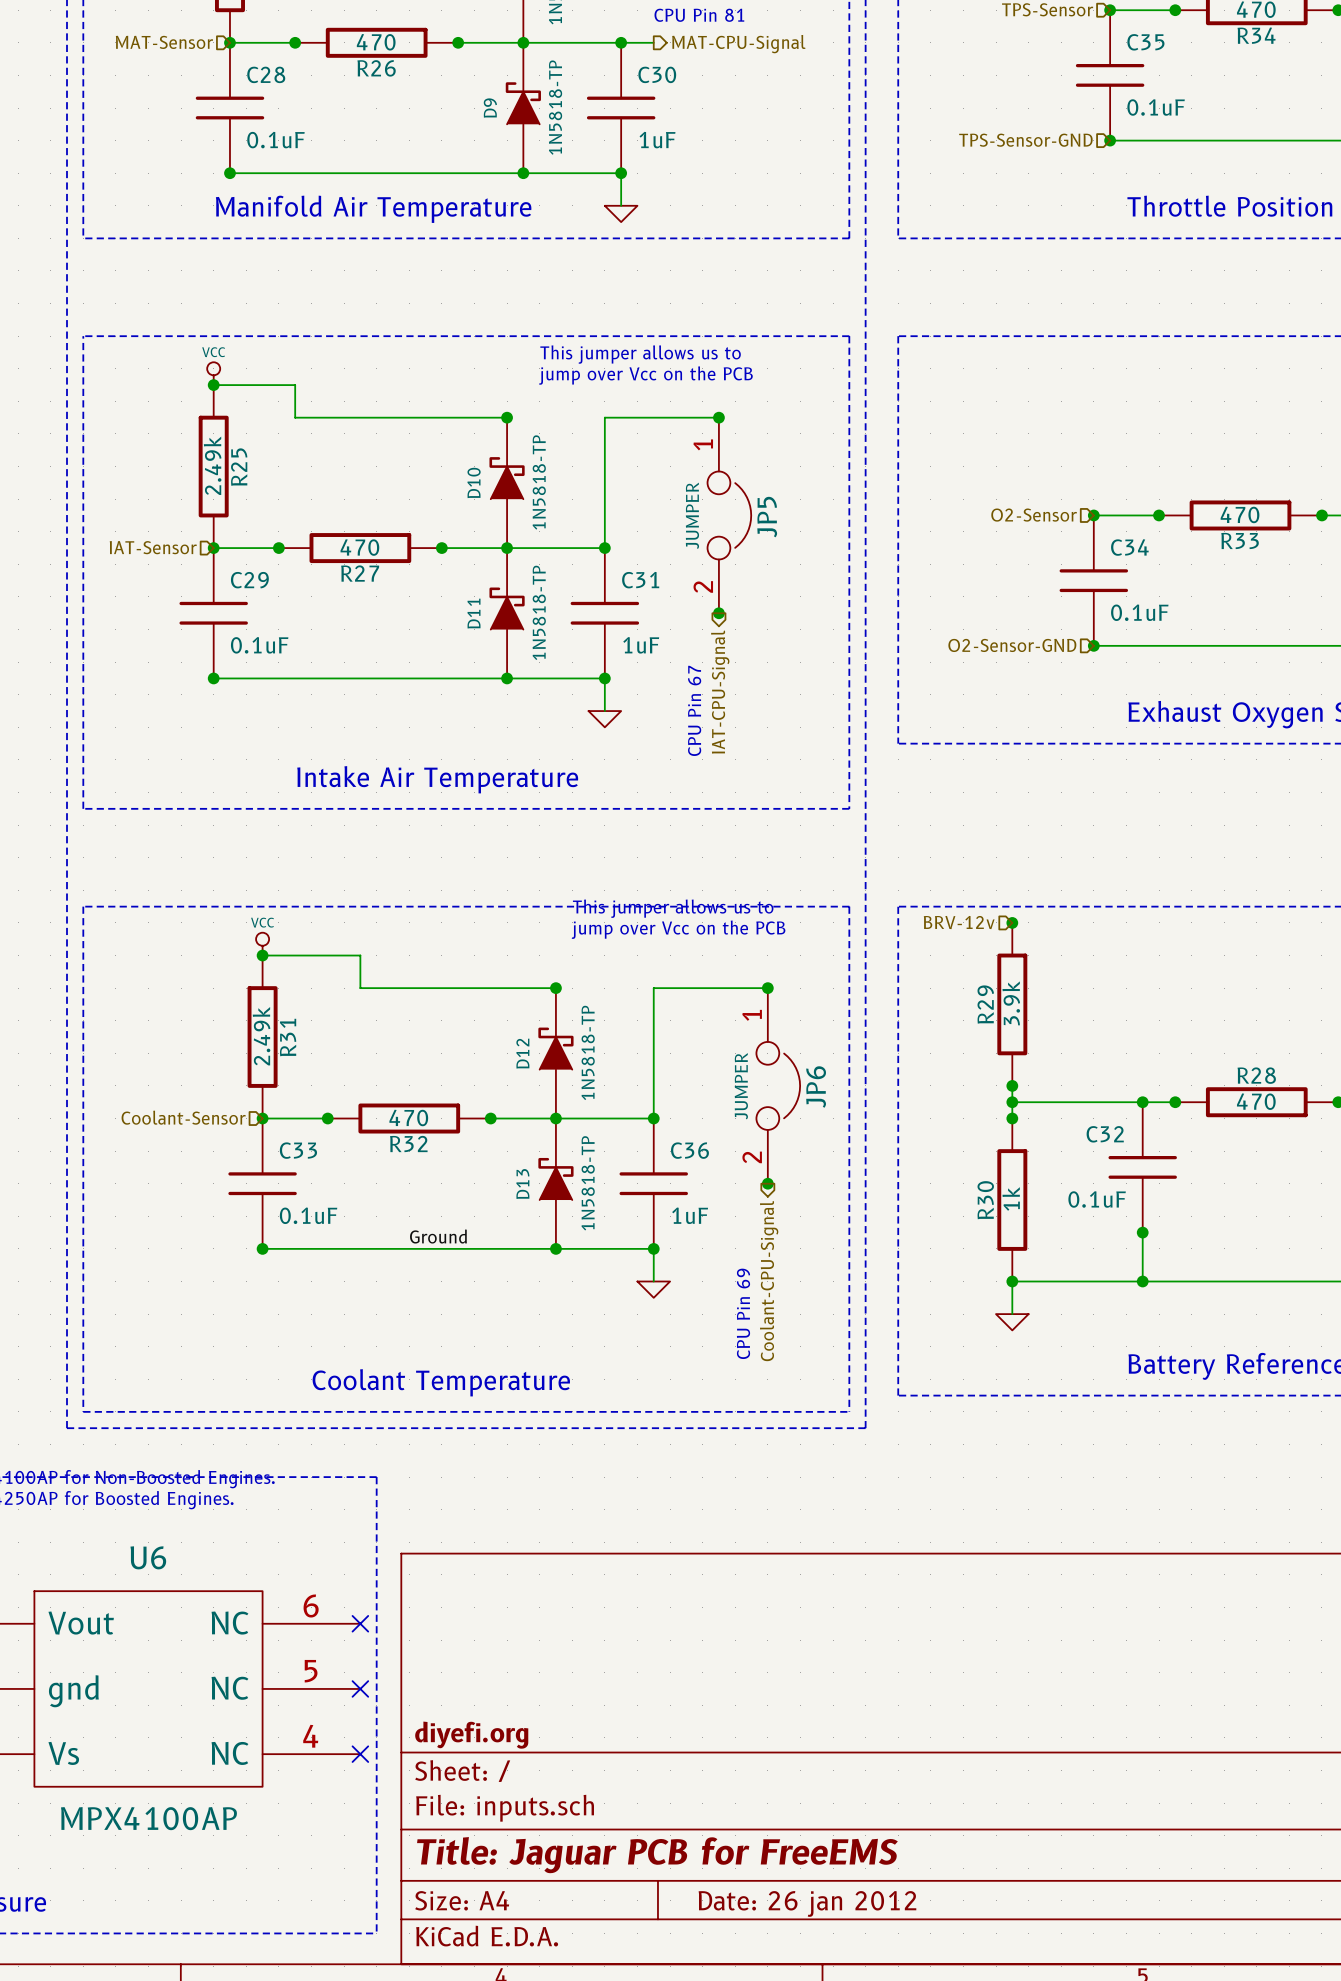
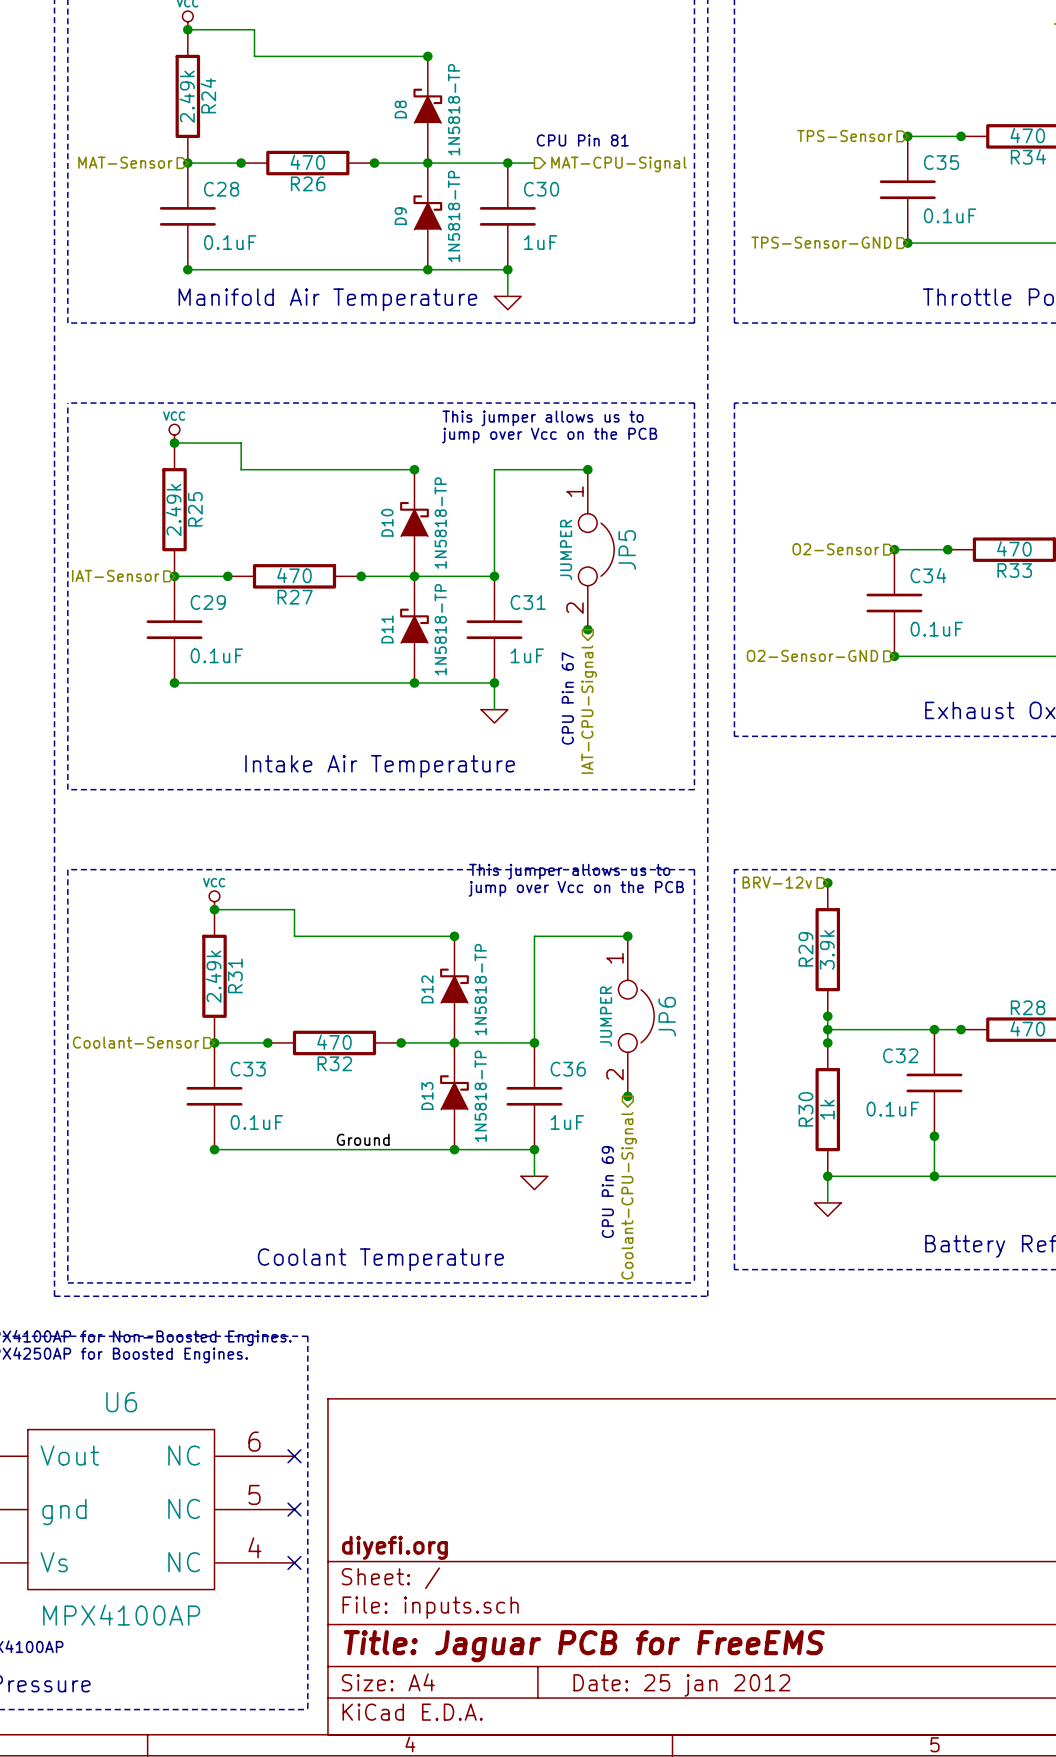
title block: Date: 26 jan 2012 (807, 1903) -> Date: 25 jan 2012 (681, 1685)

